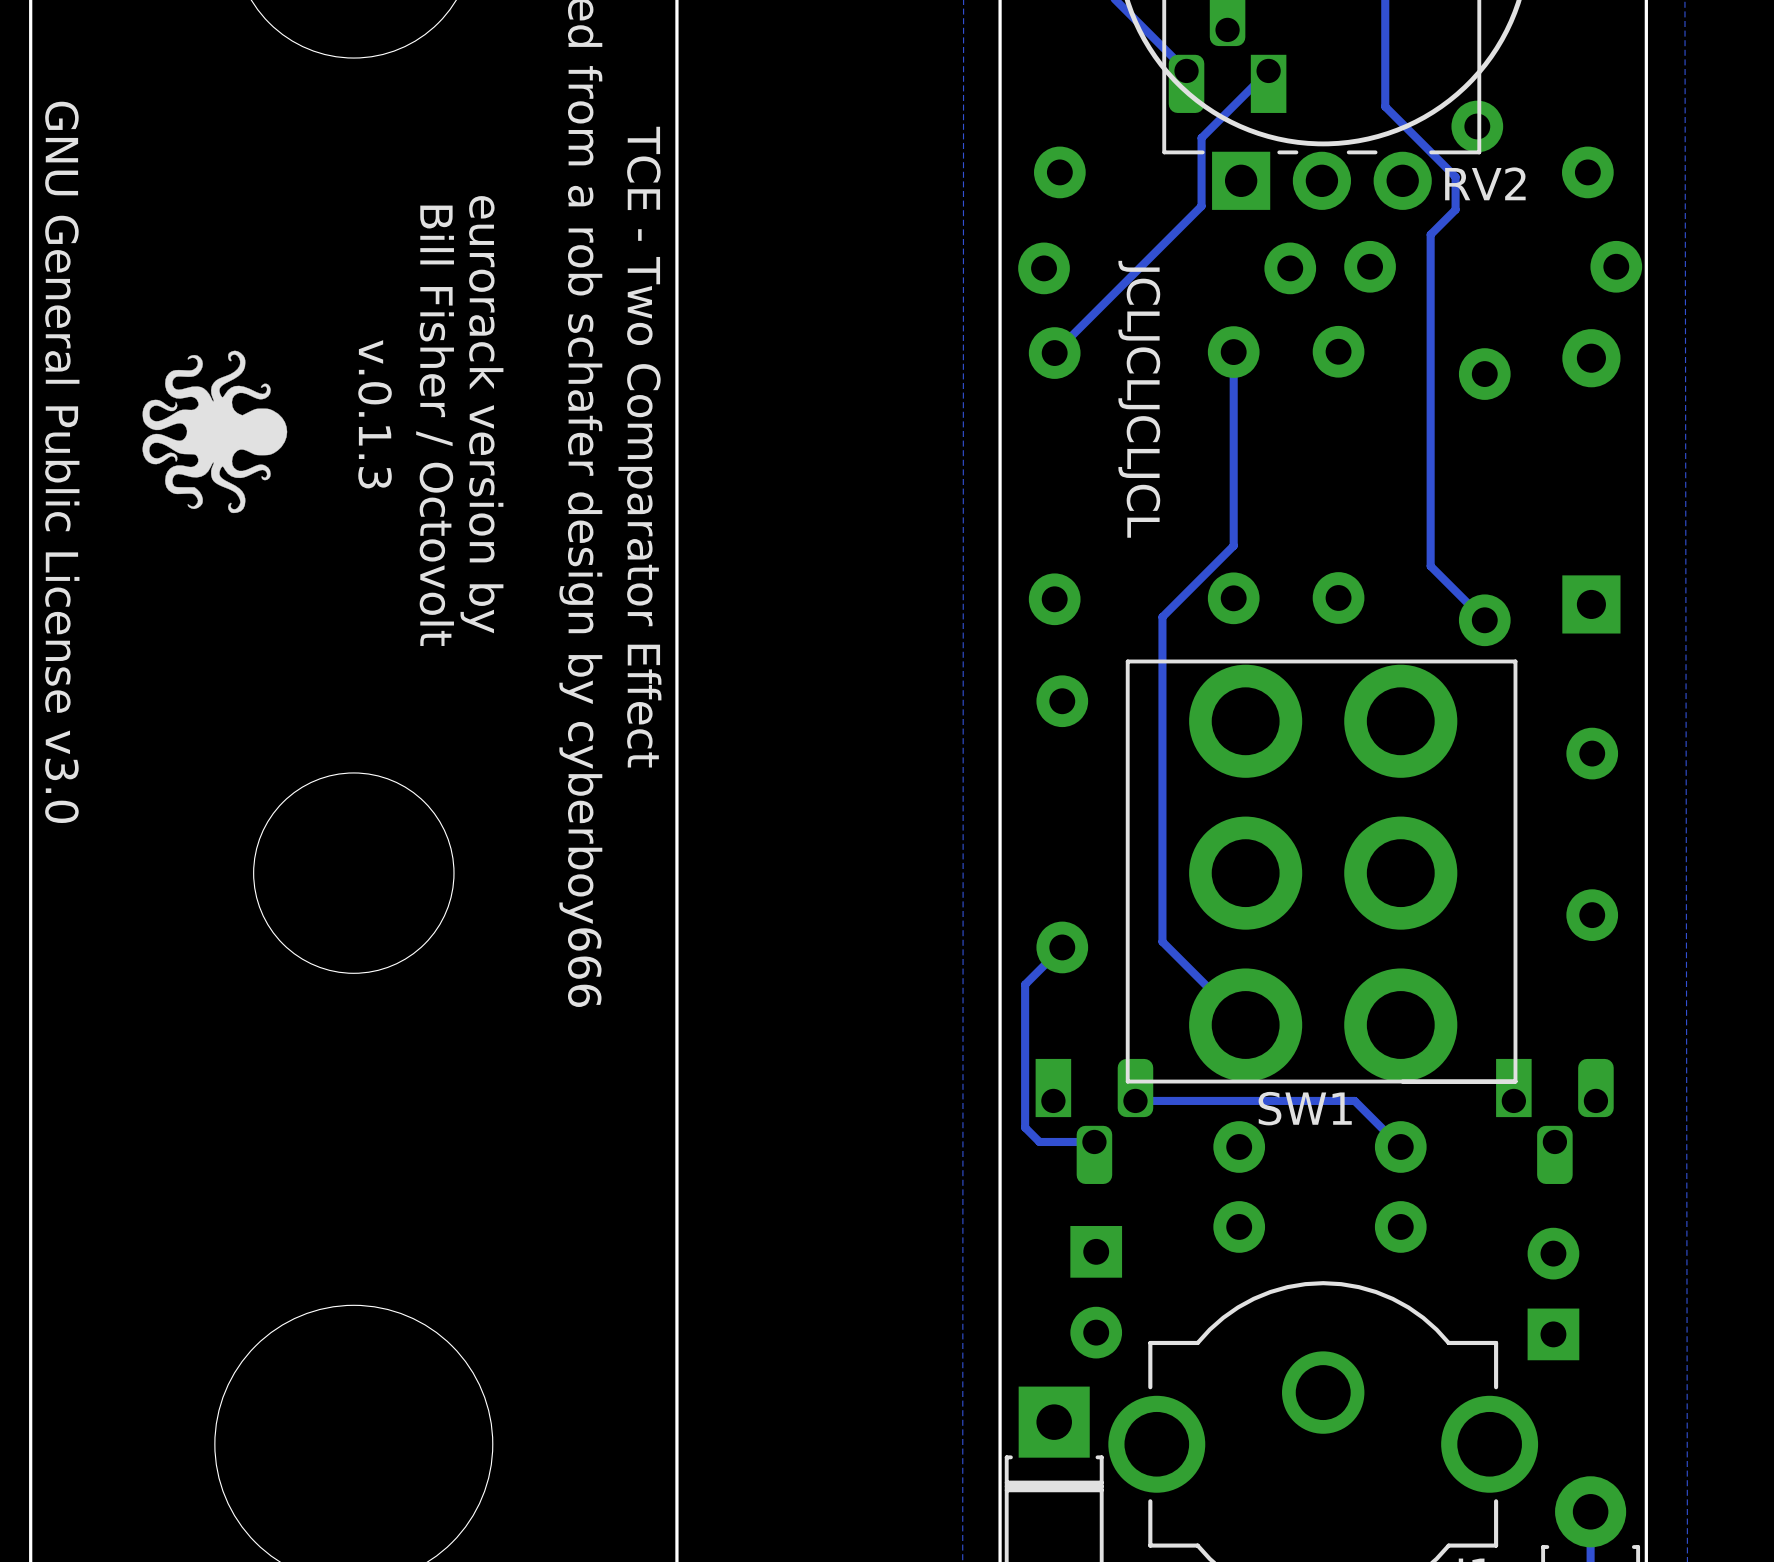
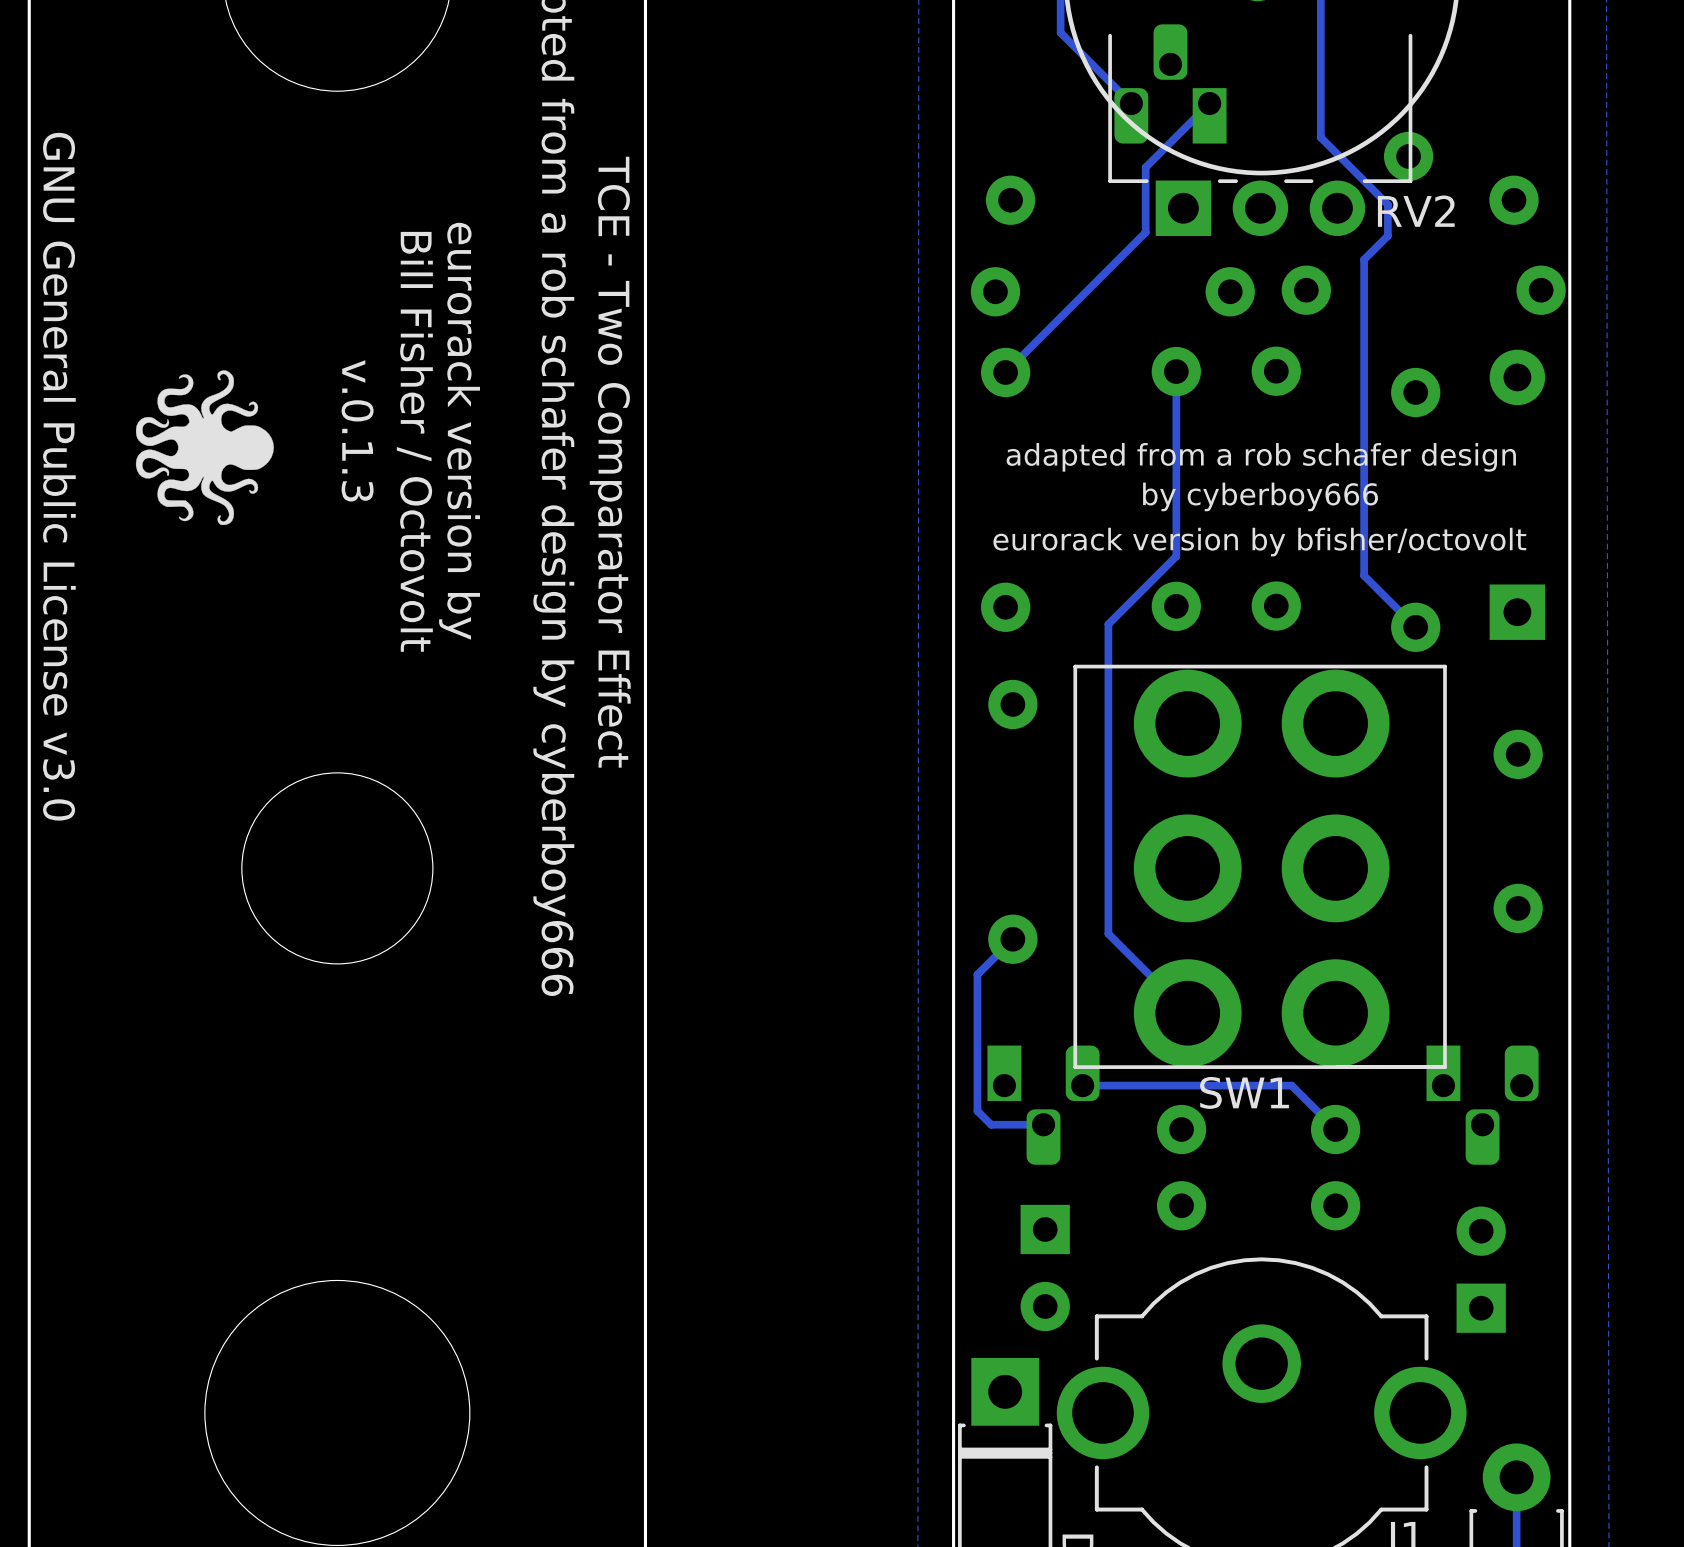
text: JCLJCLJCLJCL (1139, 399) -> none
text: none -> adapted from a rob schafer design (1261, 457)
text: none -> by cyberboy666 (1260, 496)
text: none -> eurorack version by bfisher/octovolt (1259, 542)

